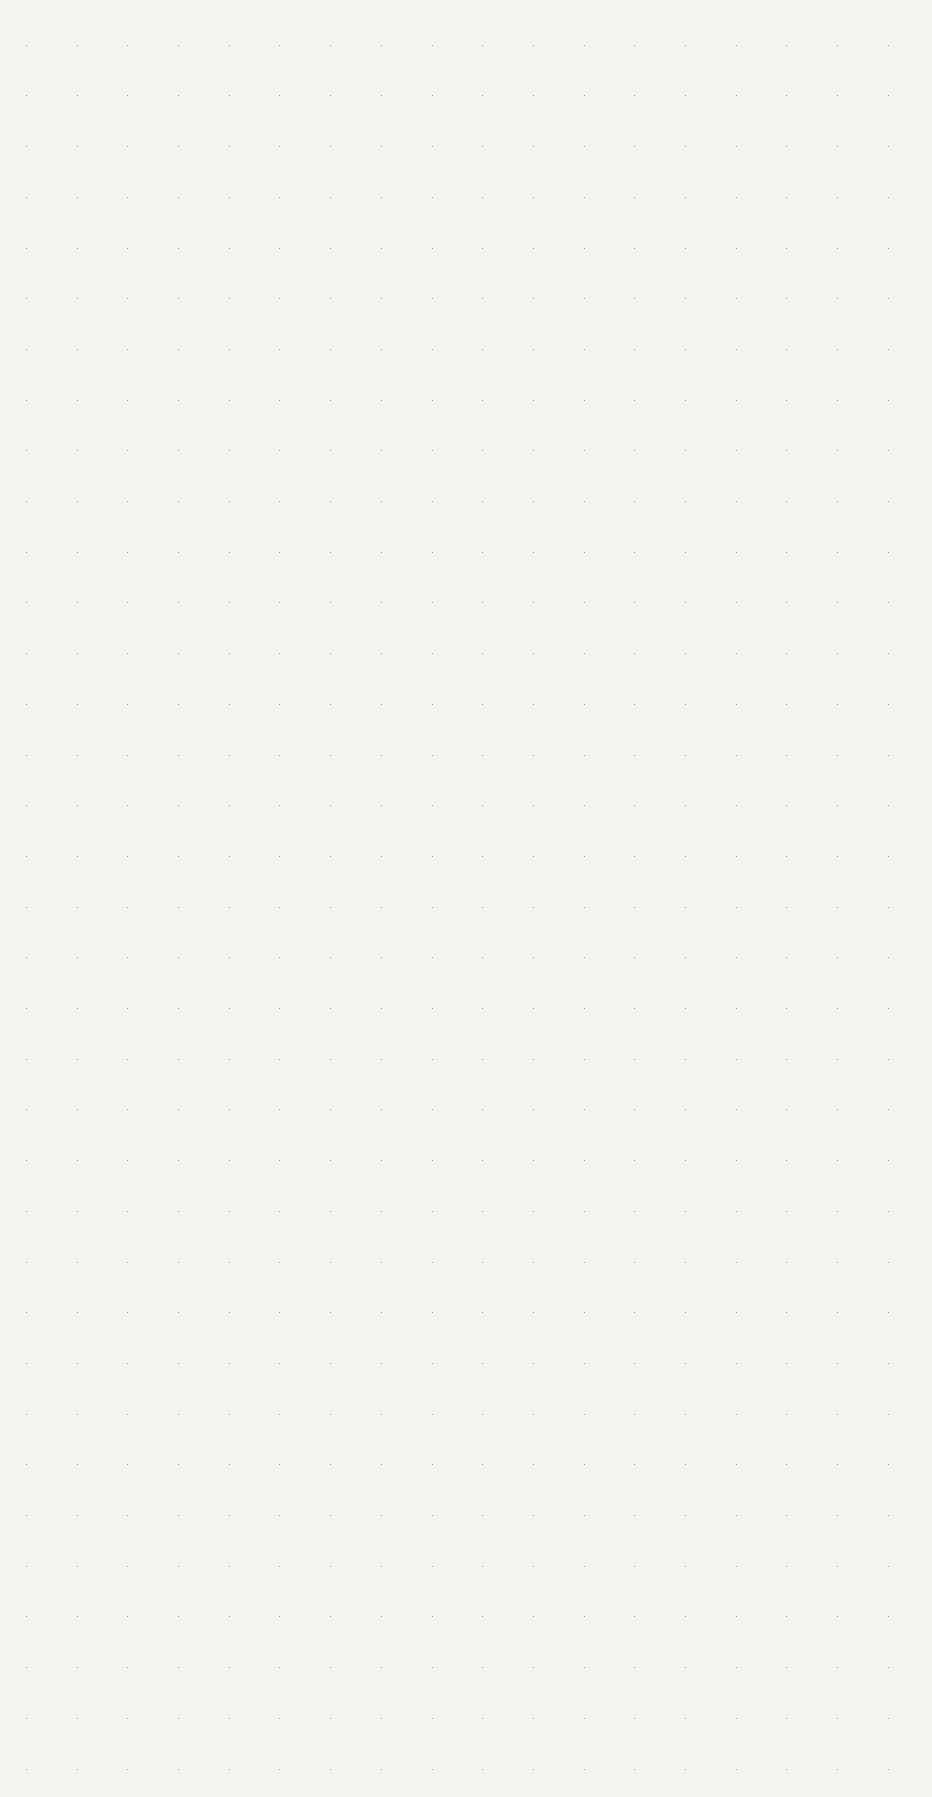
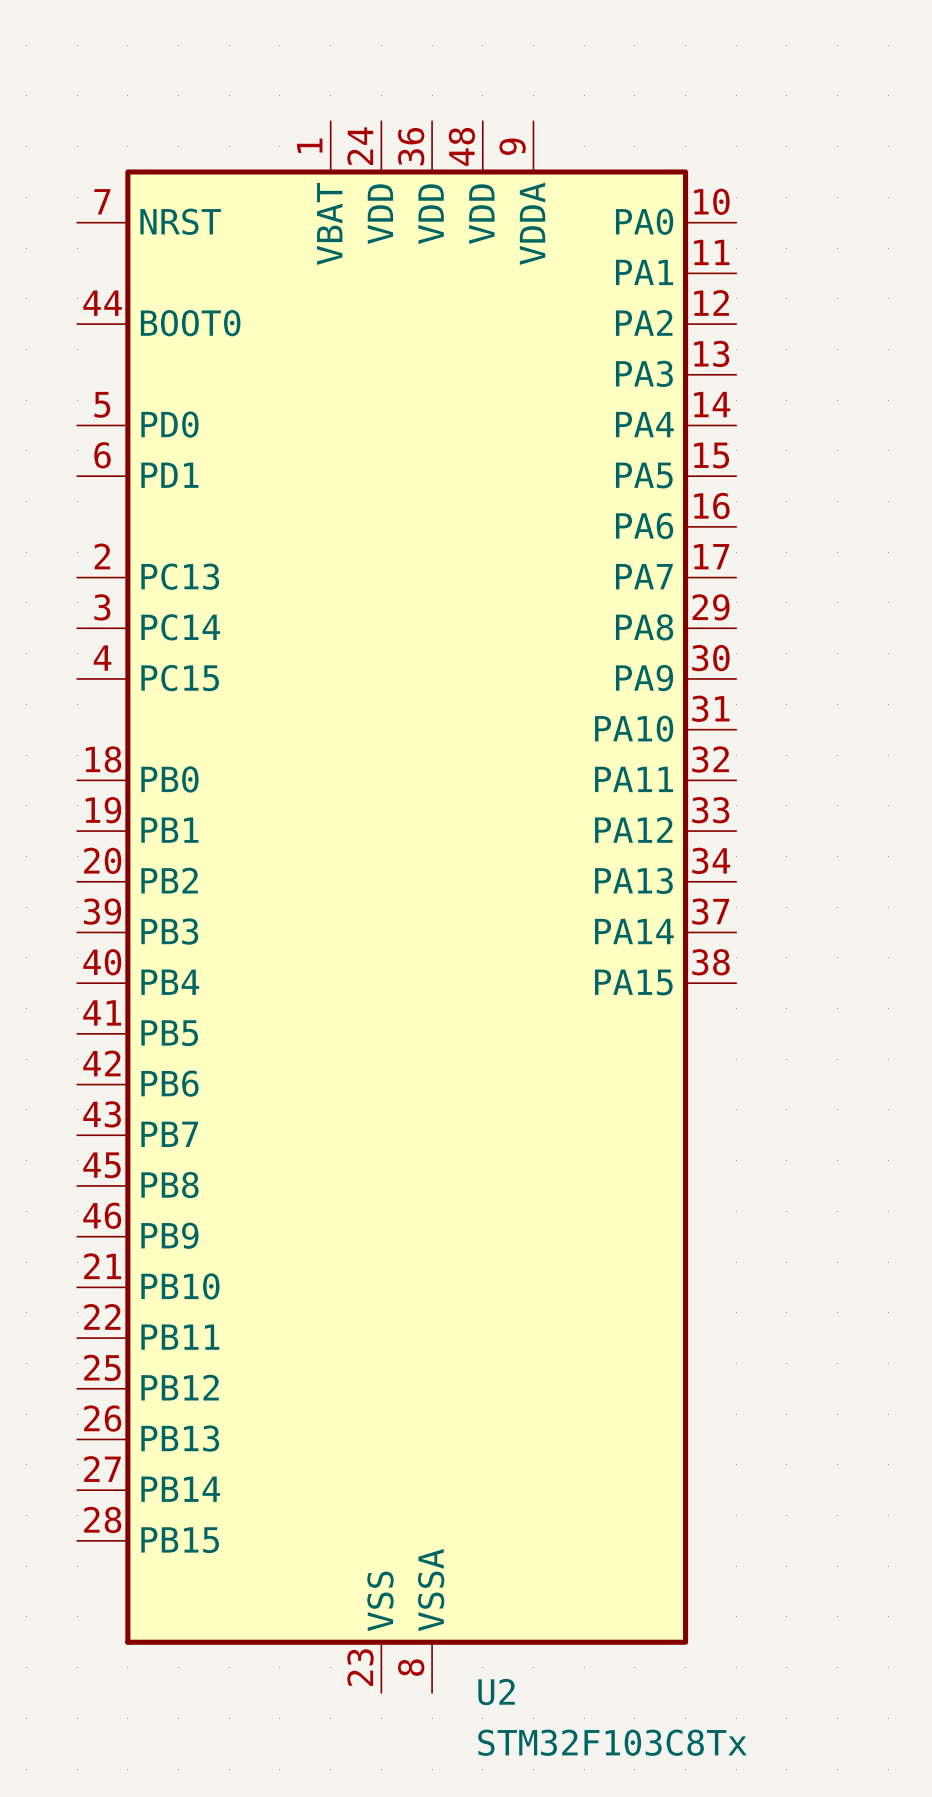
U2: none -> STM32F103C8Tx (406, 907)

